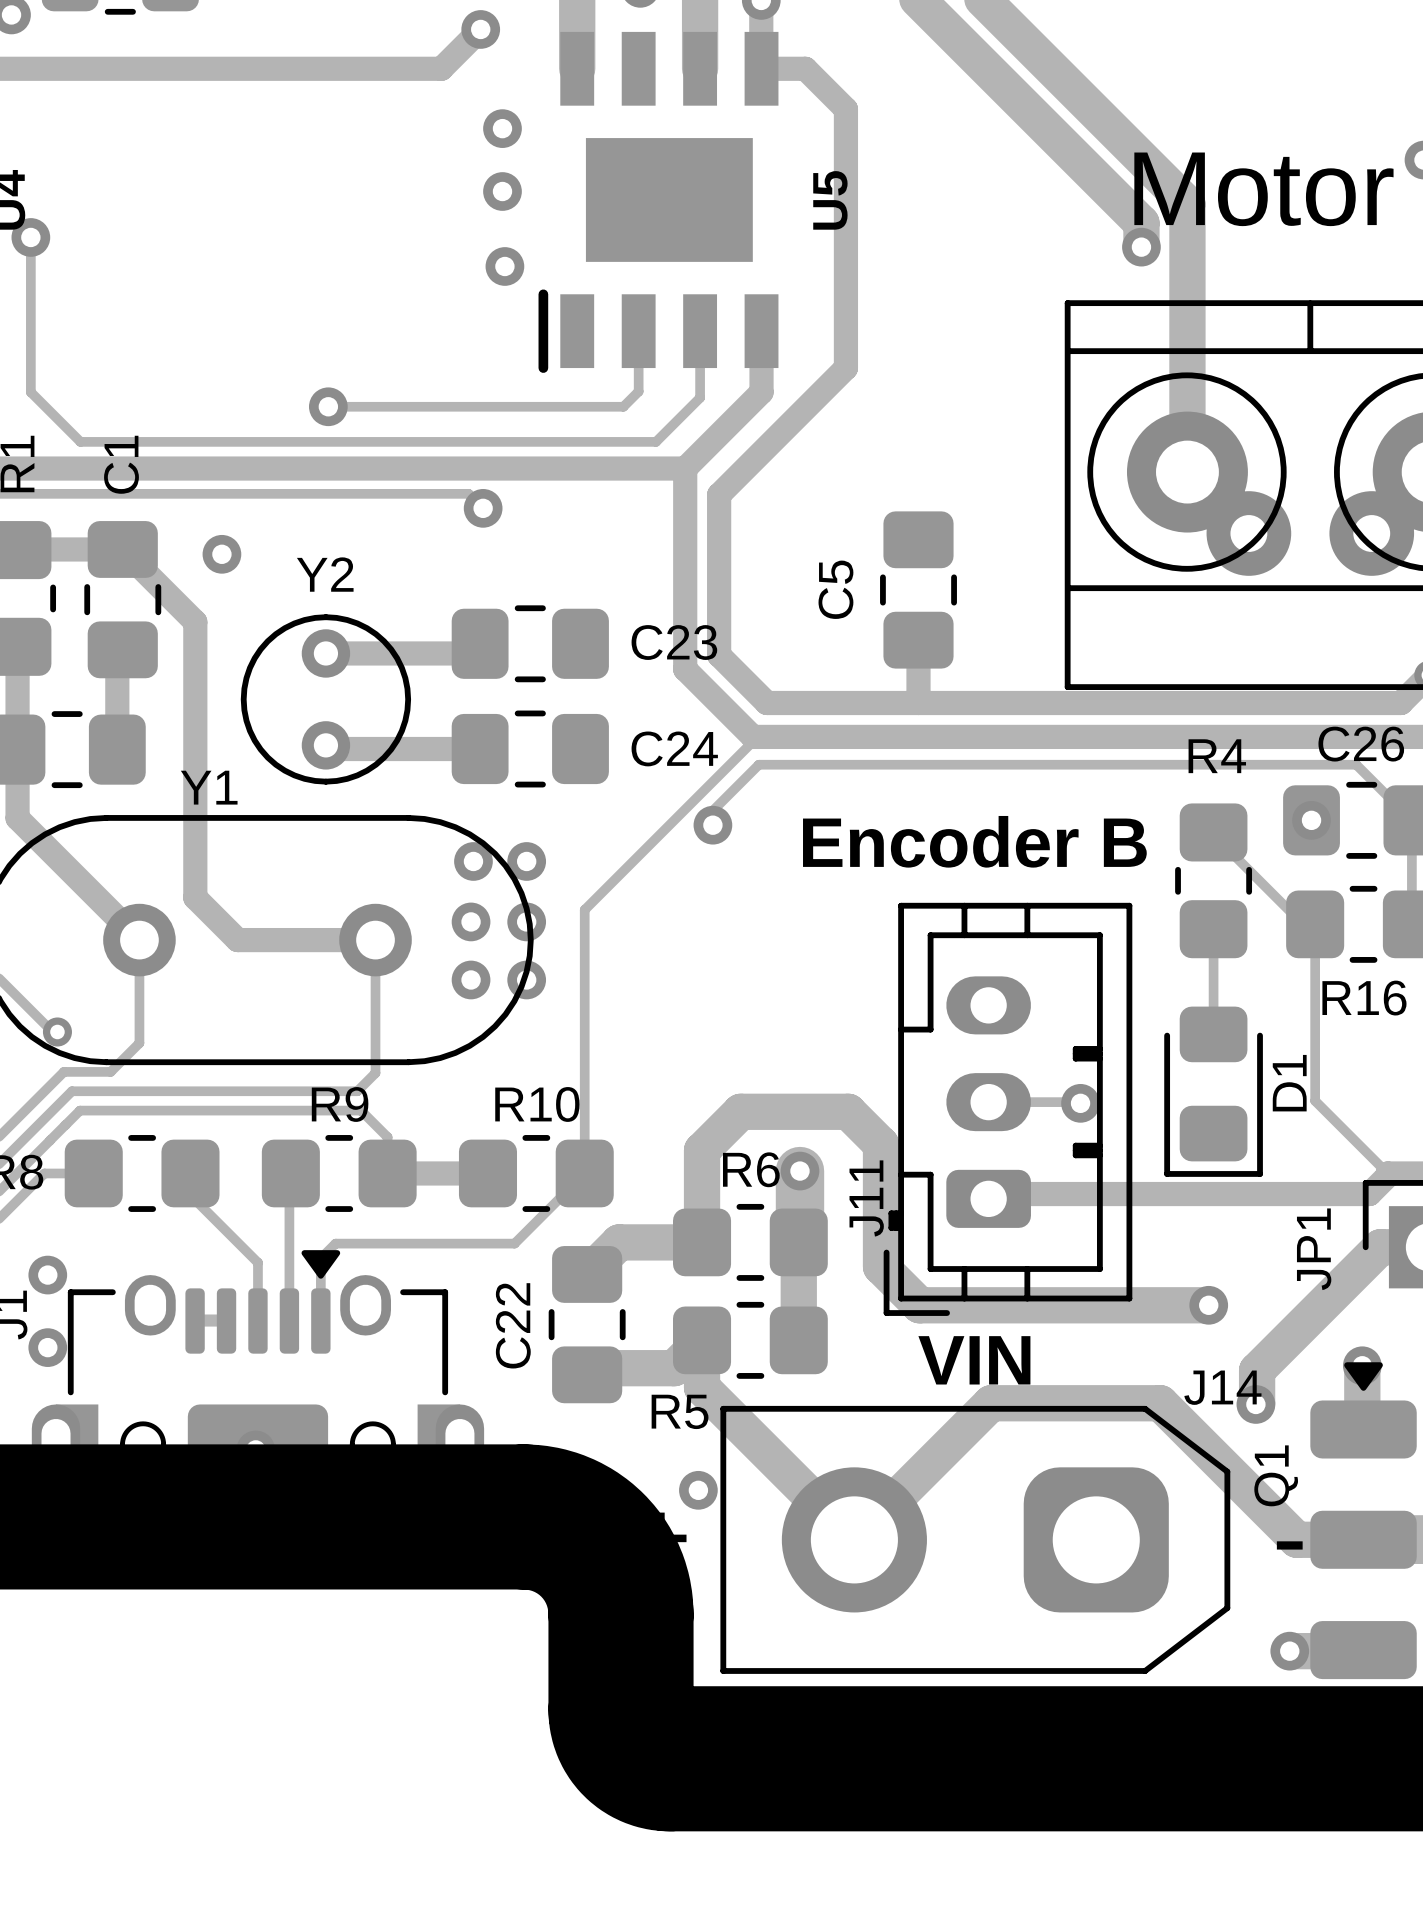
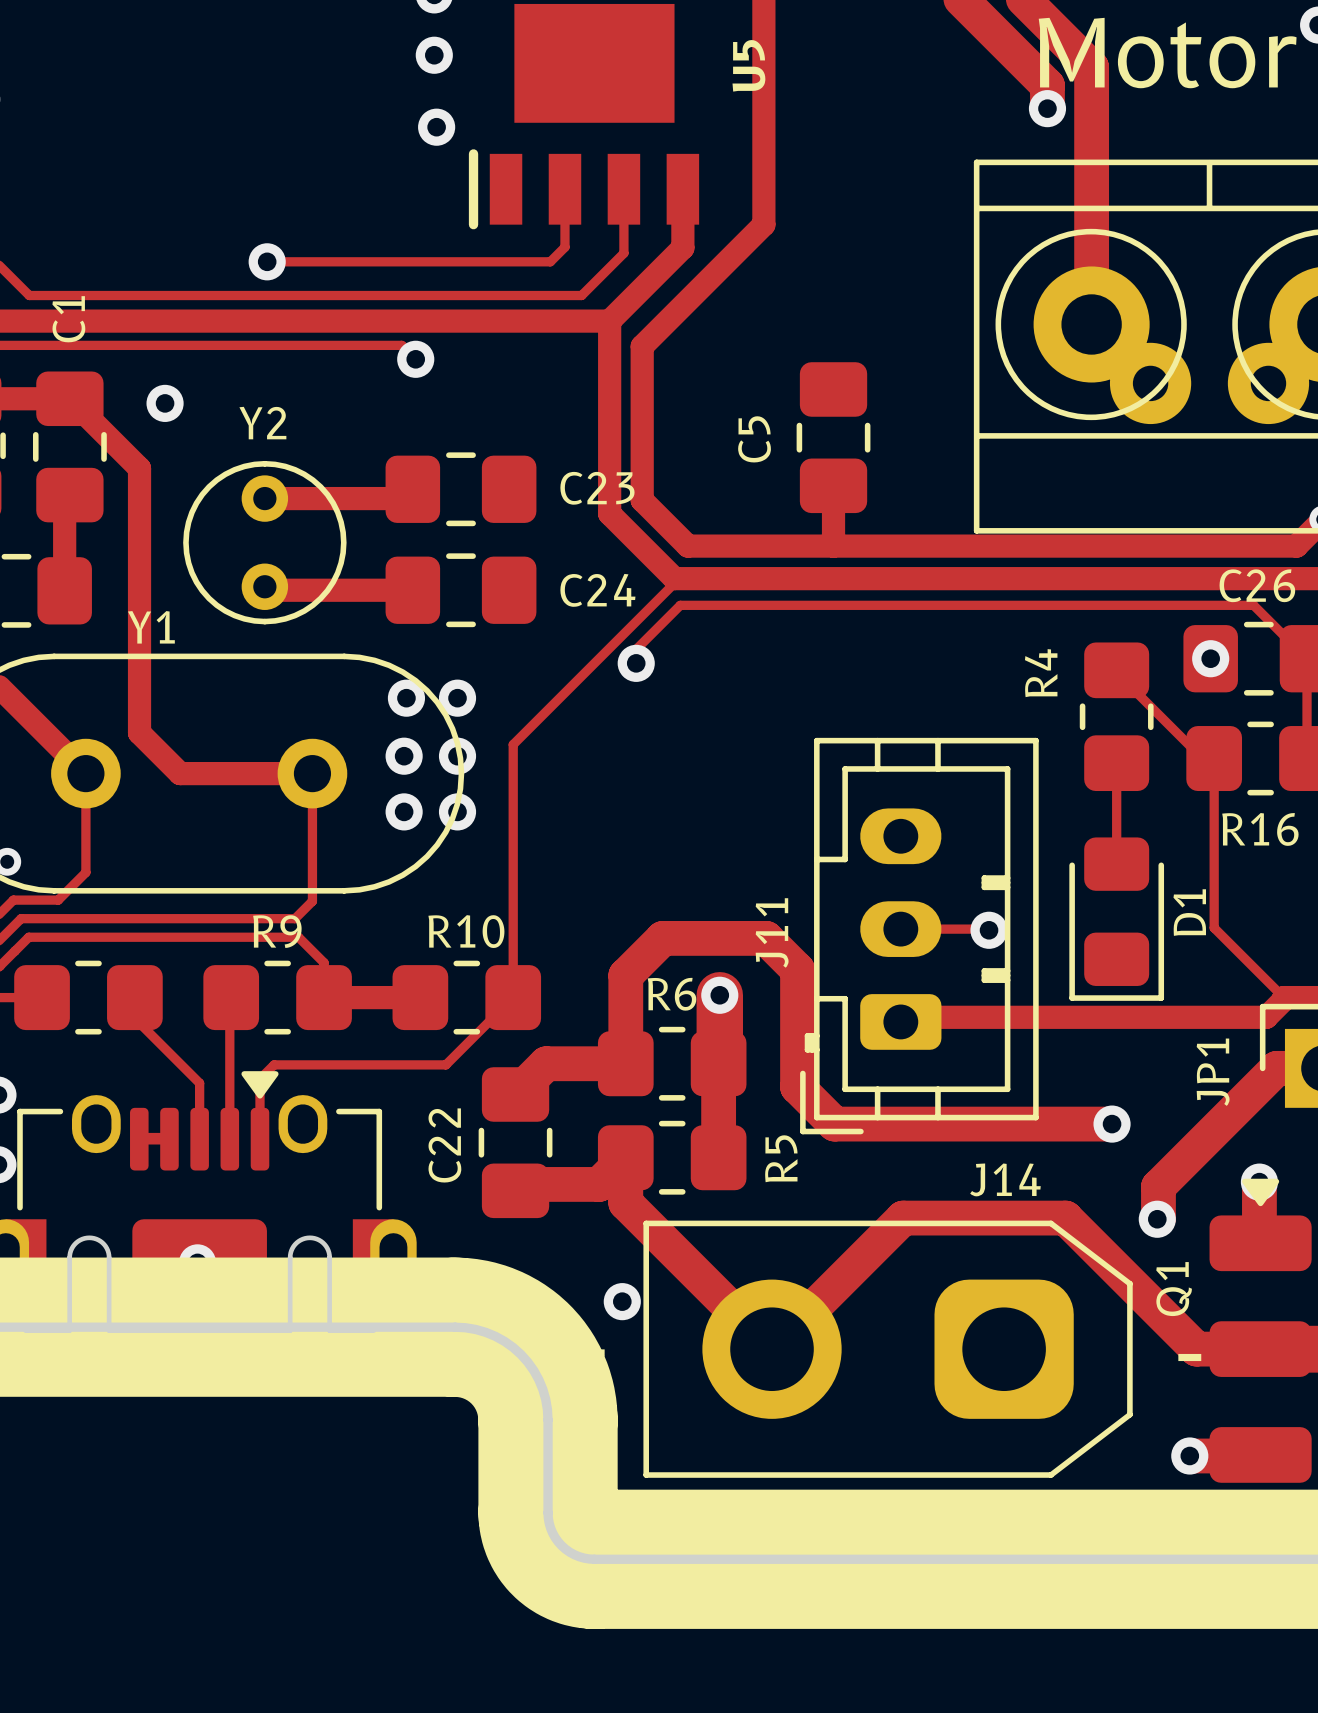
R4 name rotation: 0° (1217, 756) -> 90° counterclockwise (1041, 673)
R4 name position: R4 (1217, 756) -> R4 (1041, 673)
J11 value: Encoder B (974, 841) -> none
J11 name position: J11 (866, 1198) -> J11 (772, 932)
J14 value: VIN (974, 1360) -> none
J14 name position: J14 (1222, 1387) -> J14 (1005, 1179)
R5 name rotation: 0° (680, 1411) -> 90° counterclockwise (781, 1158)
R5 name position: R5 (680, 1411) -> R5 (781, 1158)

